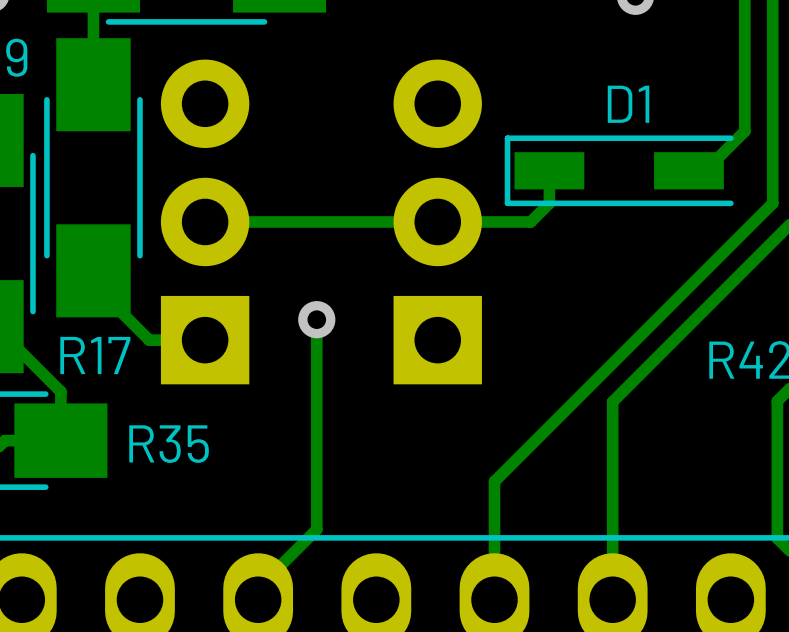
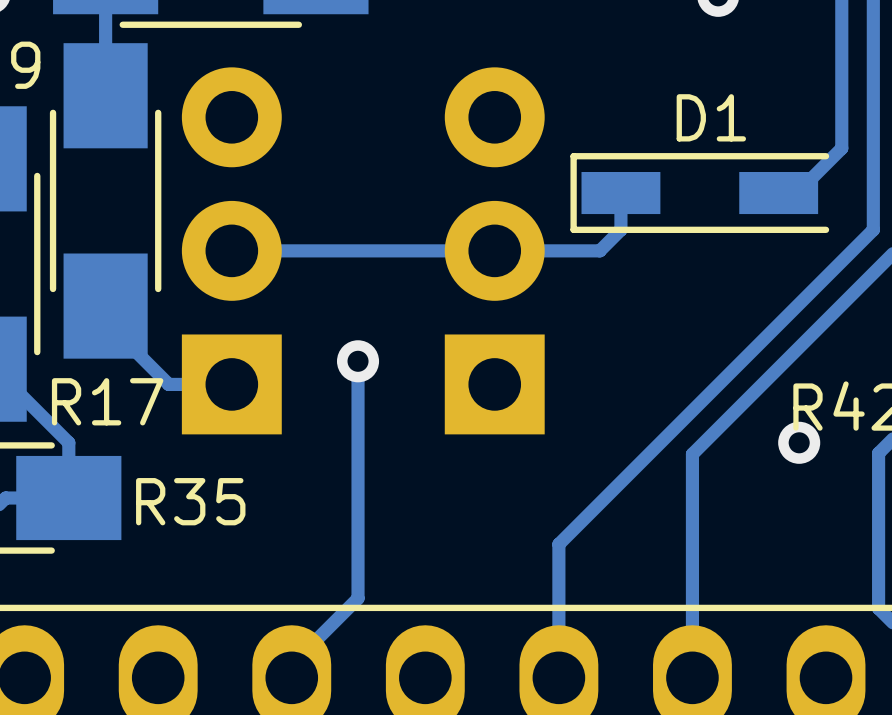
via: none -> (799, 442)

